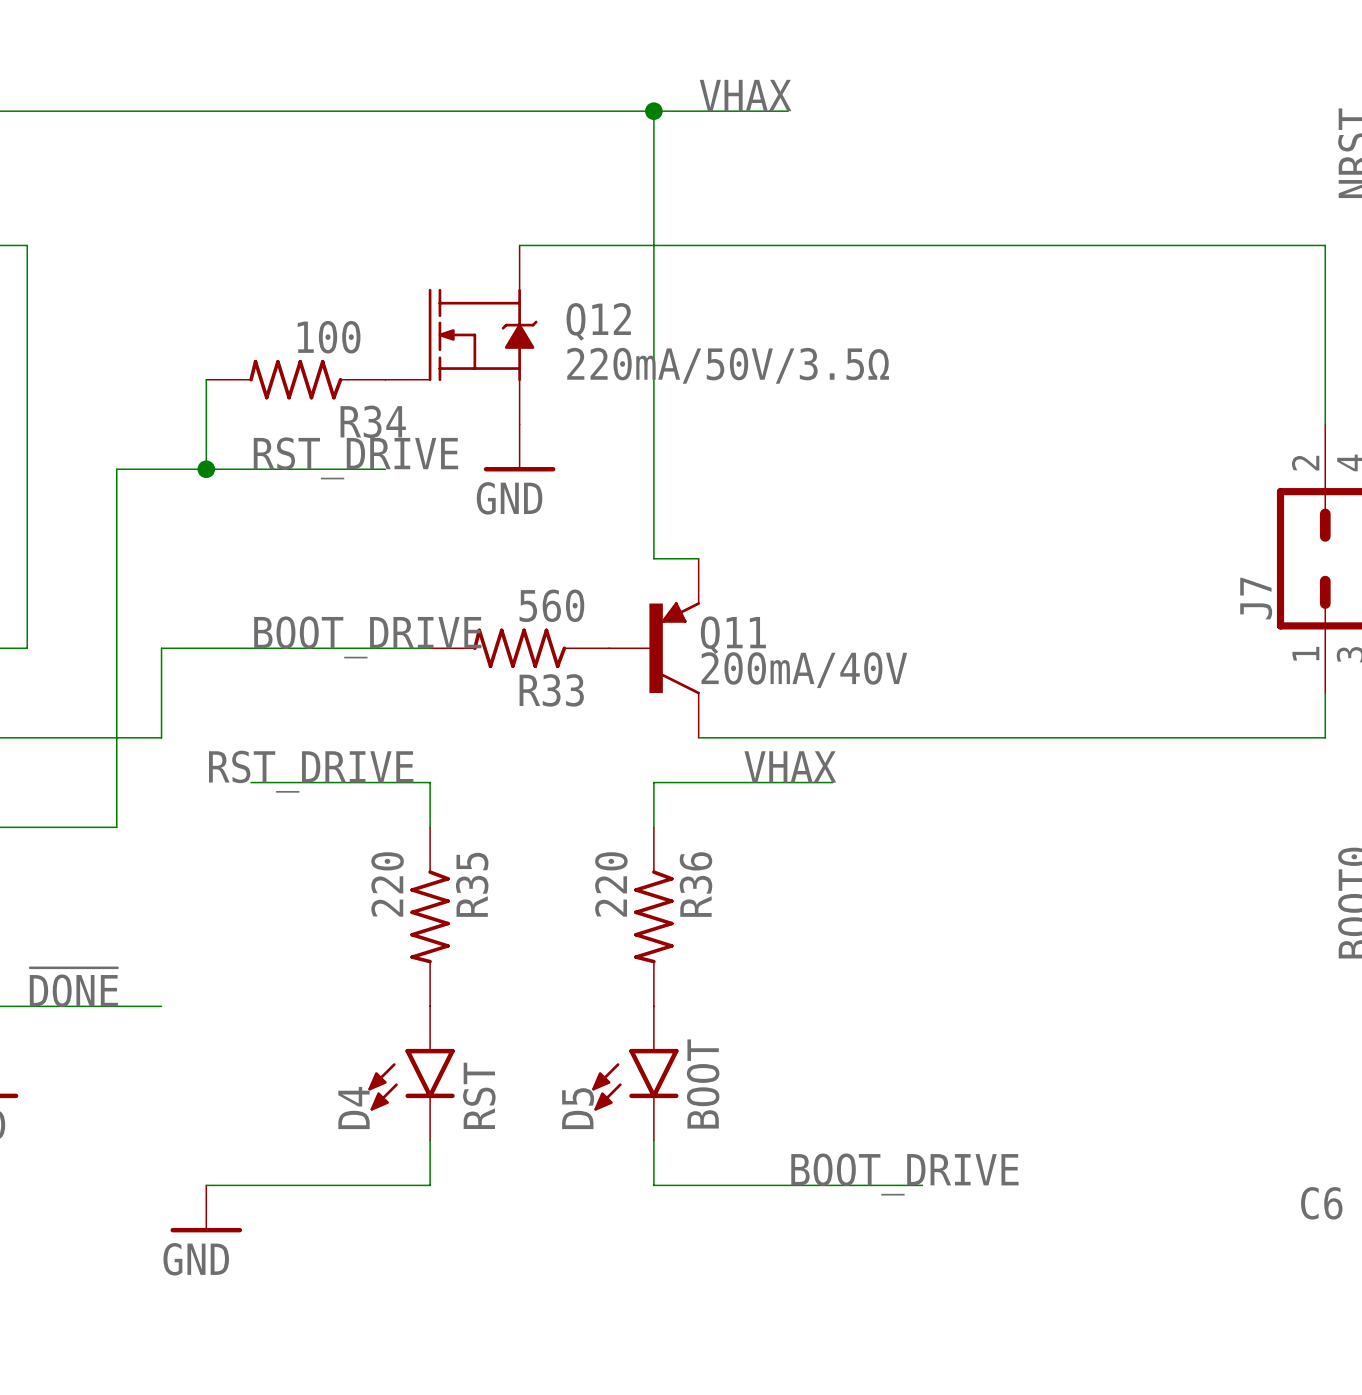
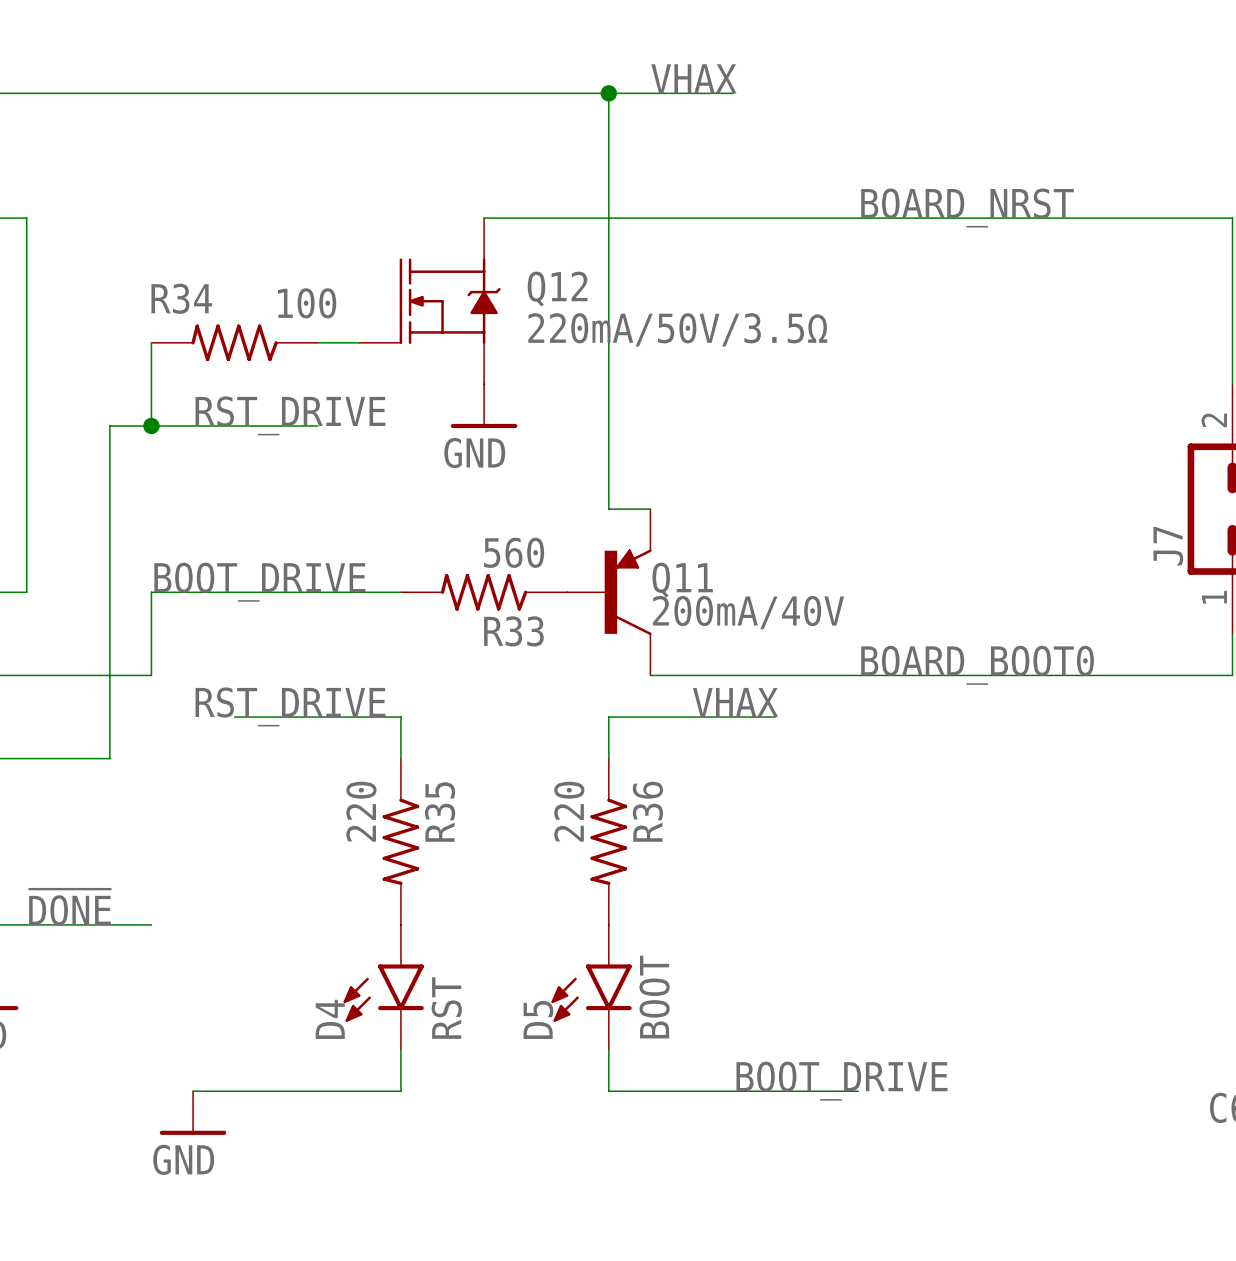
label: none -> BOARD_NRST (967, 207)
wire: (206, 379) (206, 469) -> (151, 342) (151, 425)
R34 position: (295, 379) -> (234, 342)
R34 name position: R34 (373, 421) -> R34 (181, 298)
label position: RST_DRIVE (355, 458) -> RST_DRIVE (290, 415)
junction position: (206, 469) -> (151, 425)
label position: BOOT_DRIVE (367, 637) -> BOOT_DRIVE (259, 582)
label: none -> BOARD_BOOT0 (977, 665)

